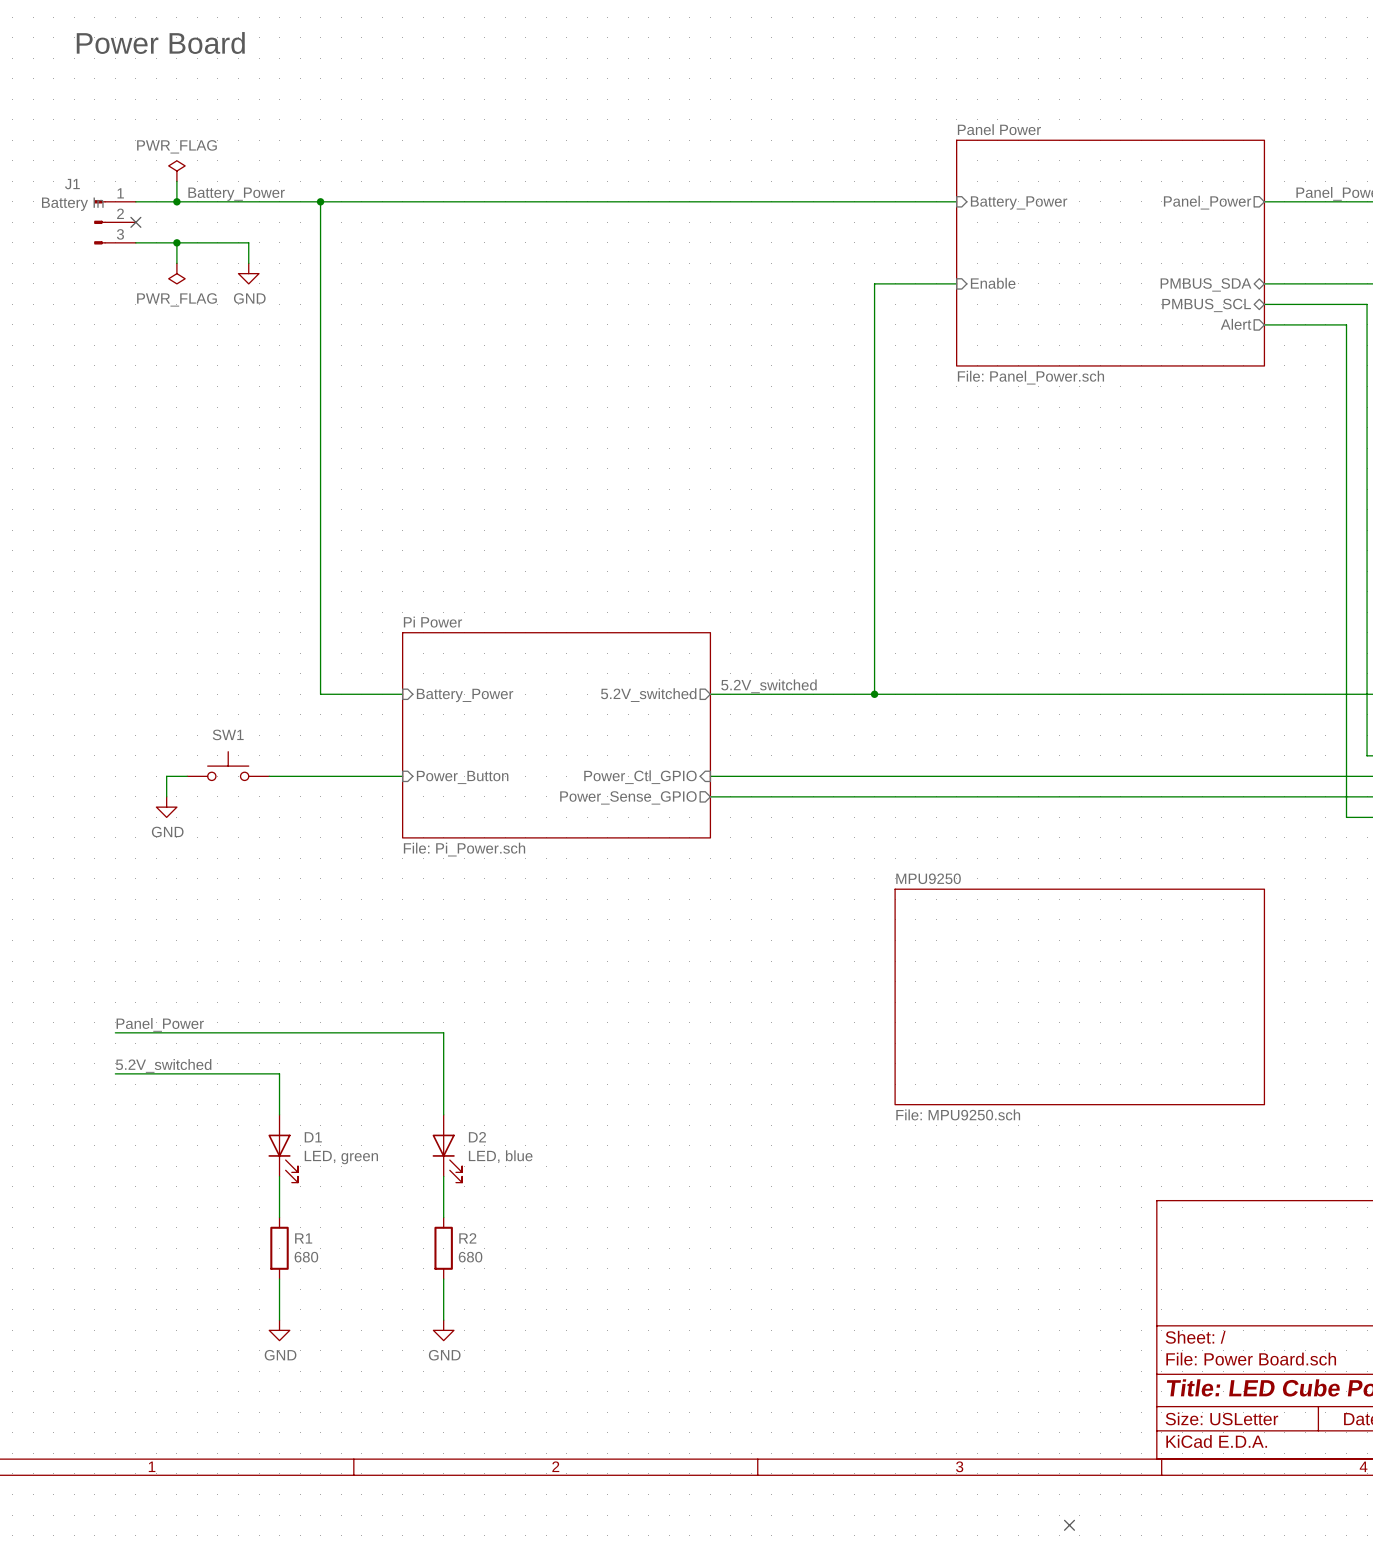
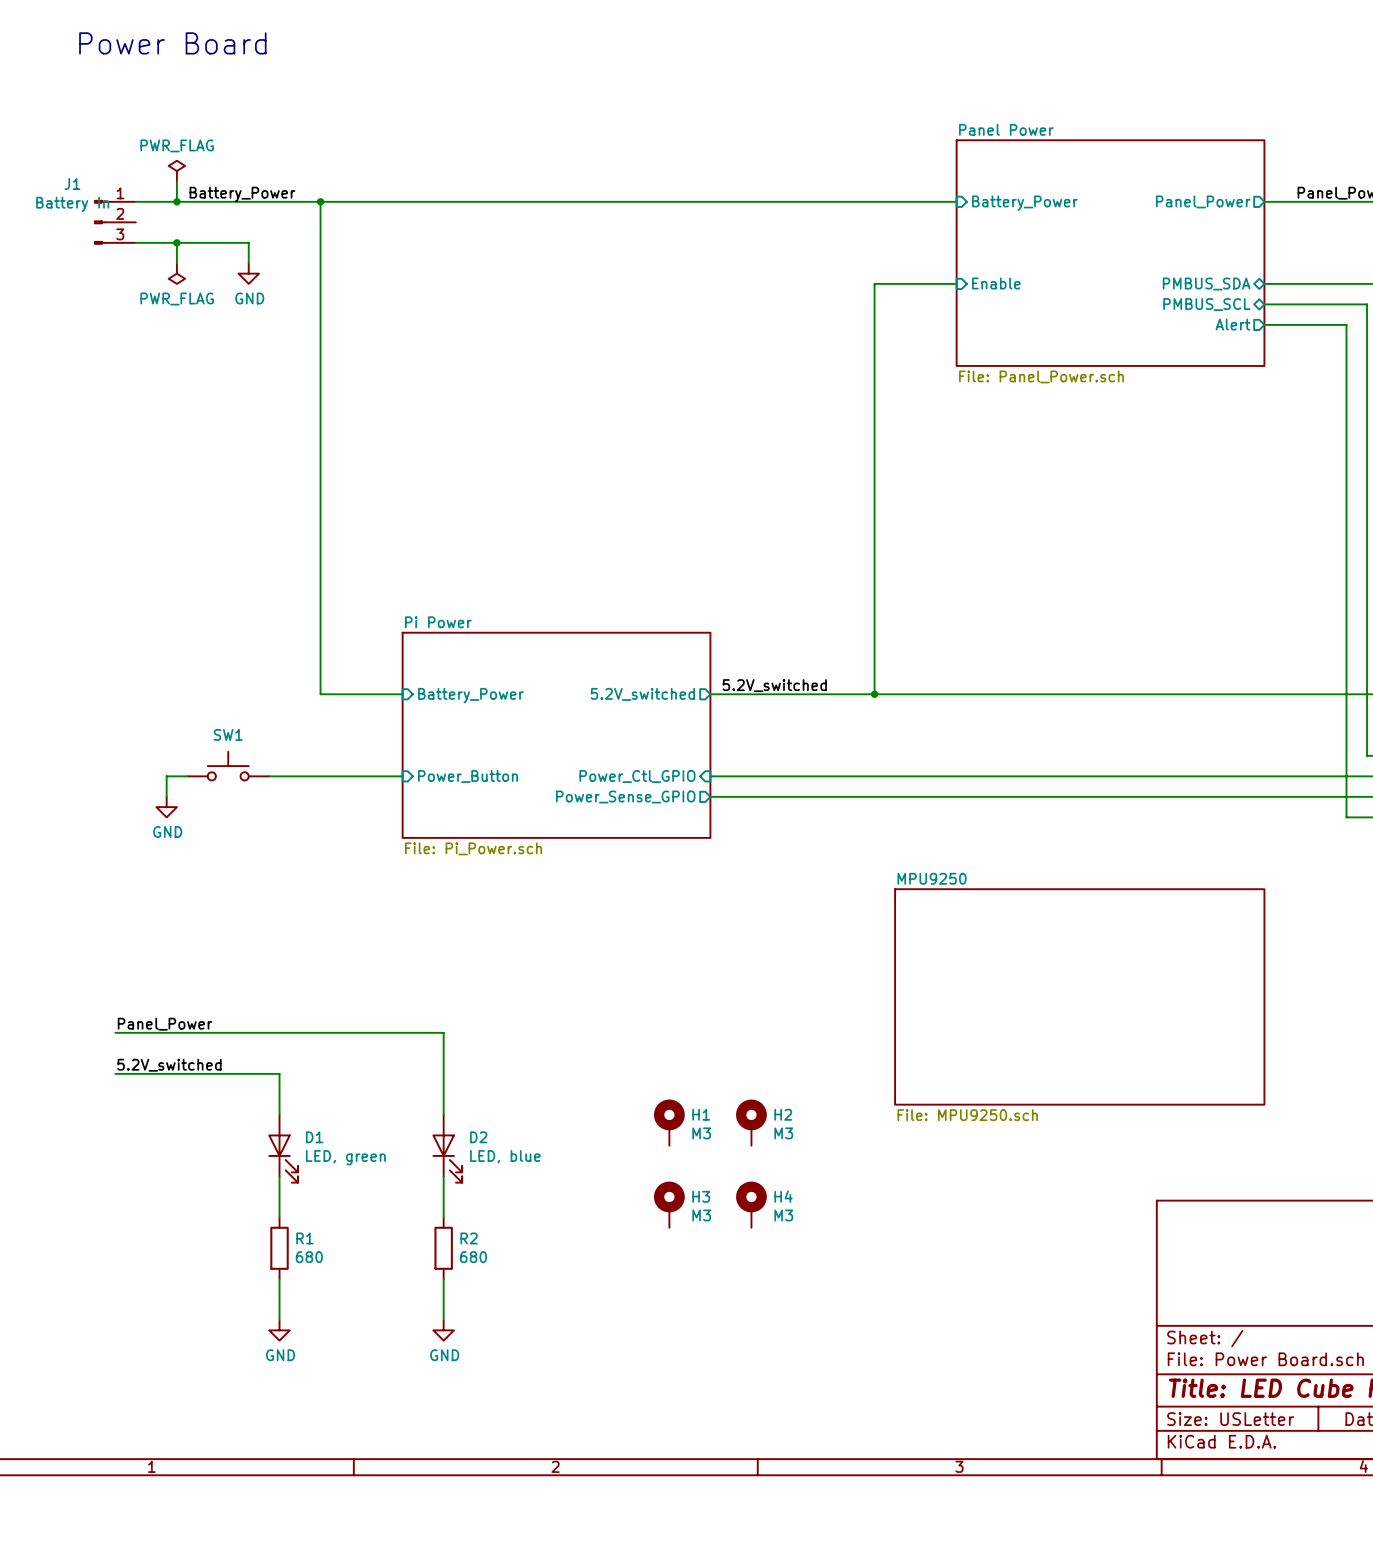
no-connect mark: (135, 222) -> none
H1: none -> M3 (669, 1122)
H2: none -> M3 (751, 1122)
H3: none -> M3 (669, 1204)
H4: none -> M3 (751, 1204)
no-connect mark: (1069, 1525) -> none

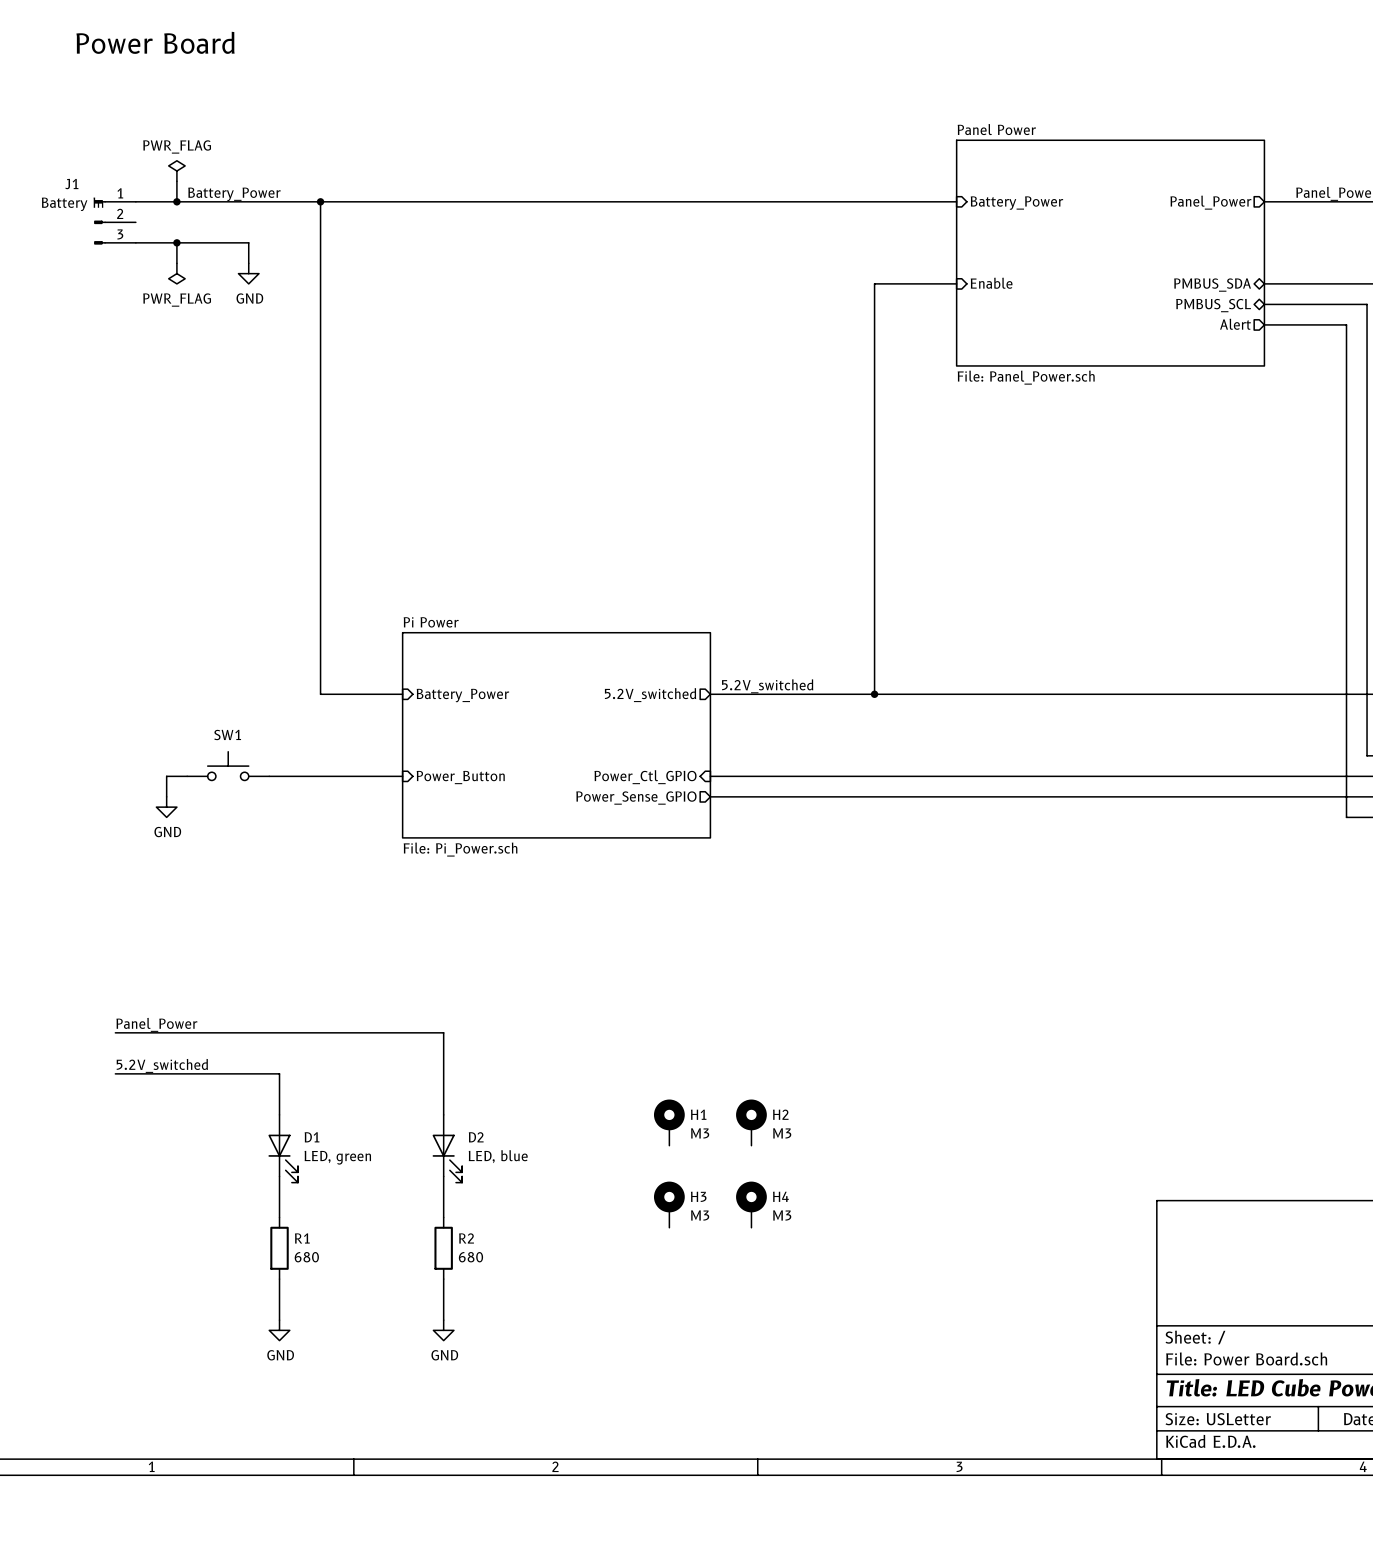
sheet MPU9250: File: MPU9250.sch (1079, 996) -> none

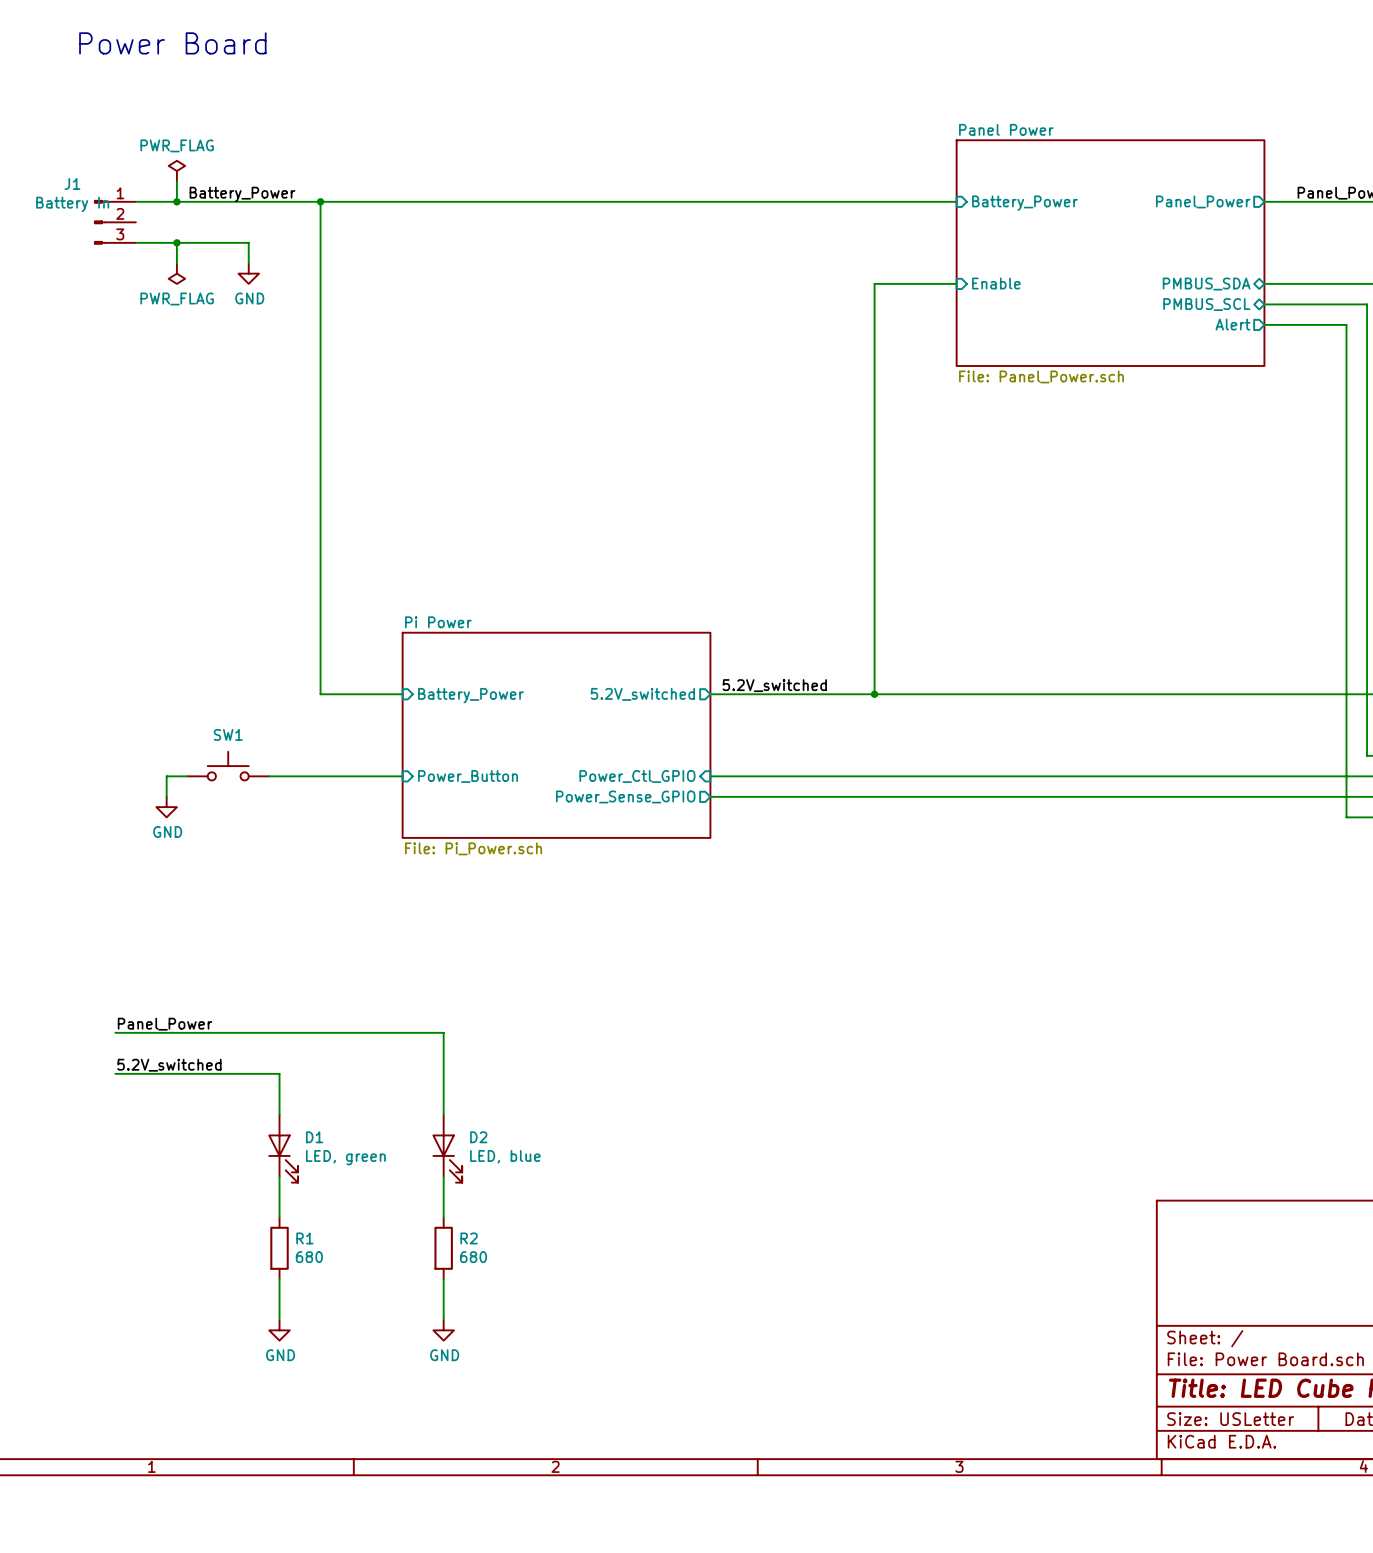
H1: M3 (669, 1122) -> none
H2: M3 (751, 1122) -> none
H3: M3 (669, 1204) -> none
H4: M3 (751, 1204) -> none

